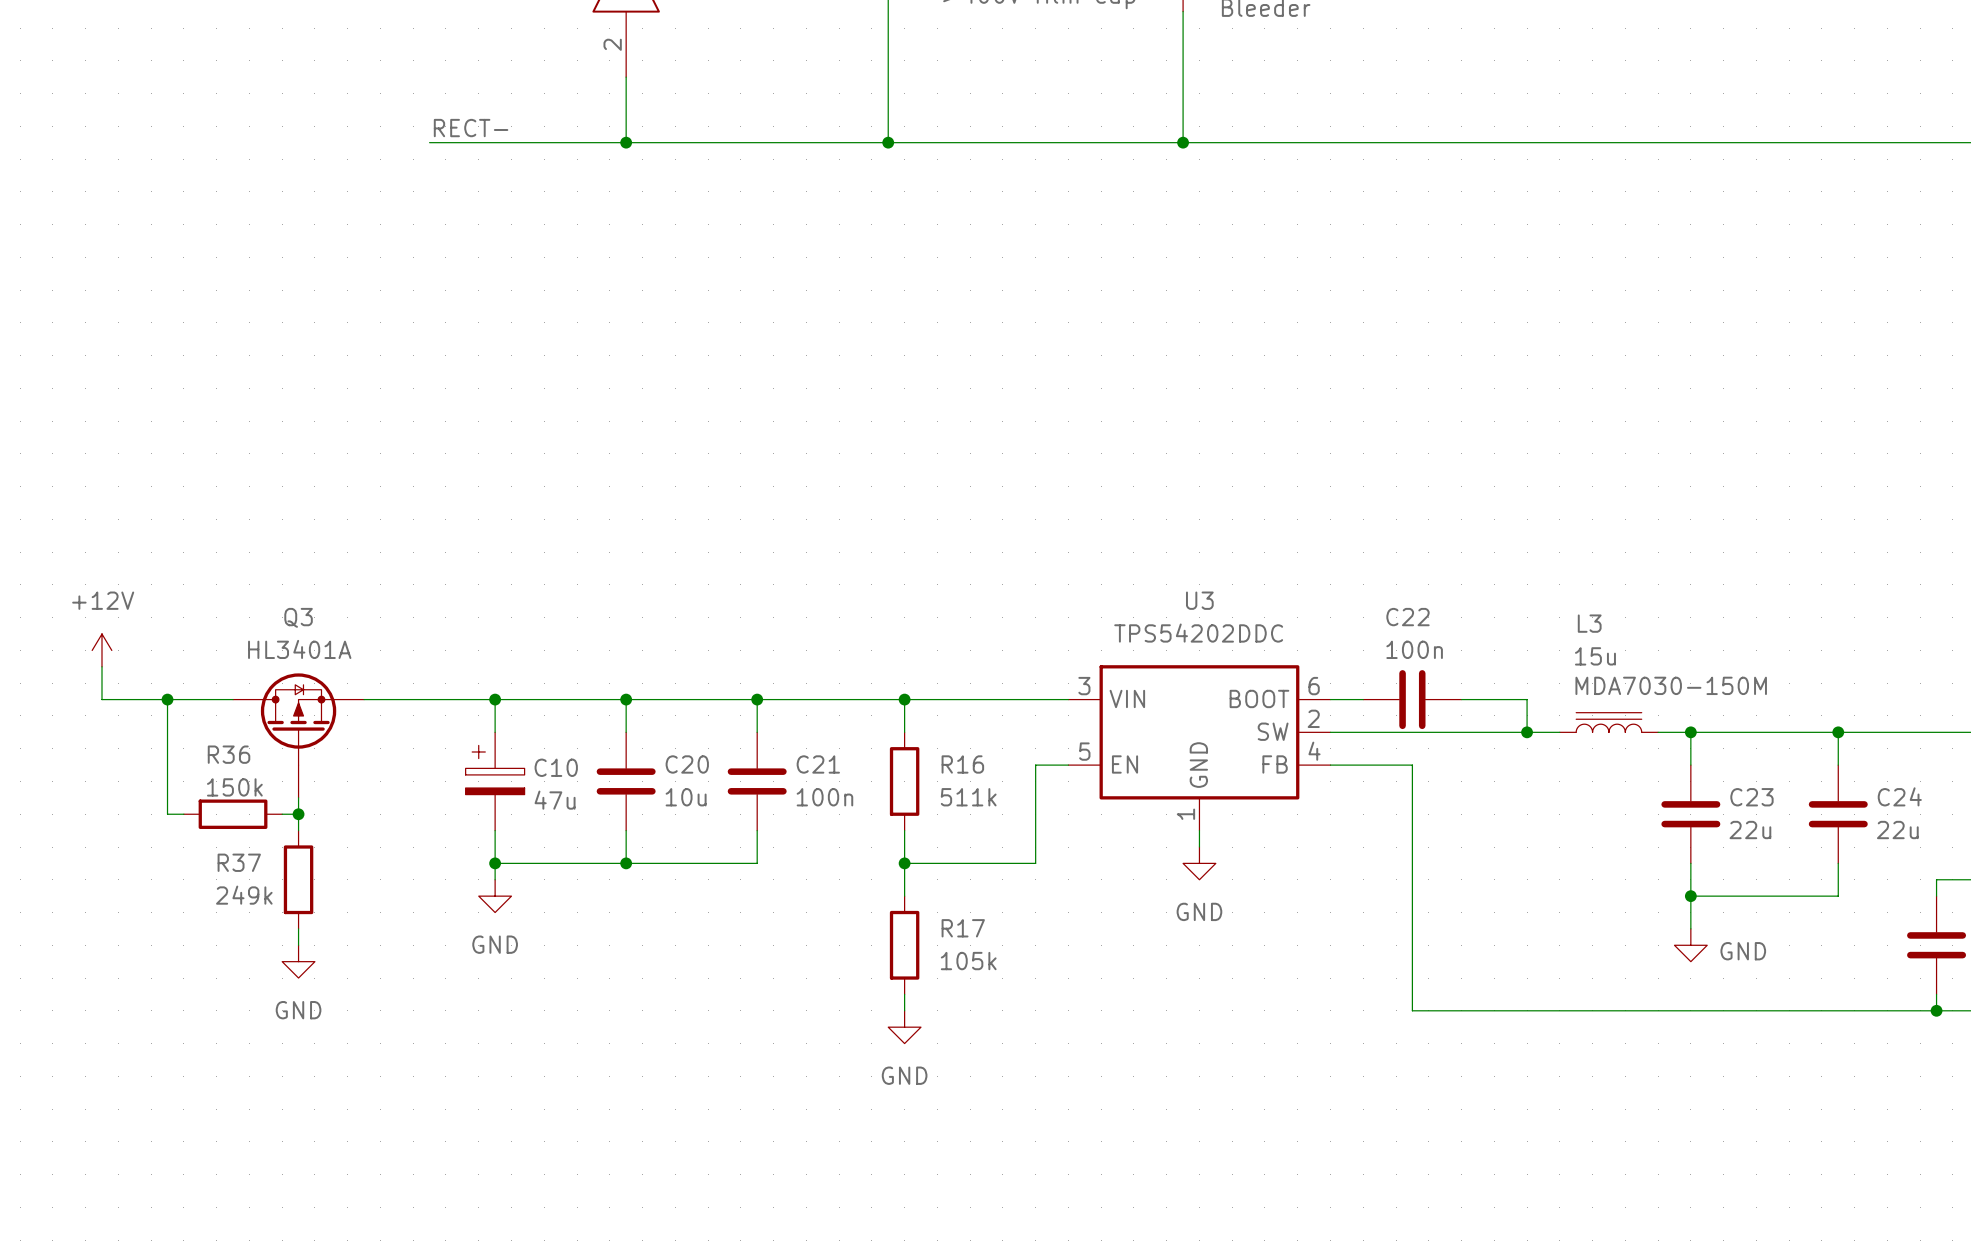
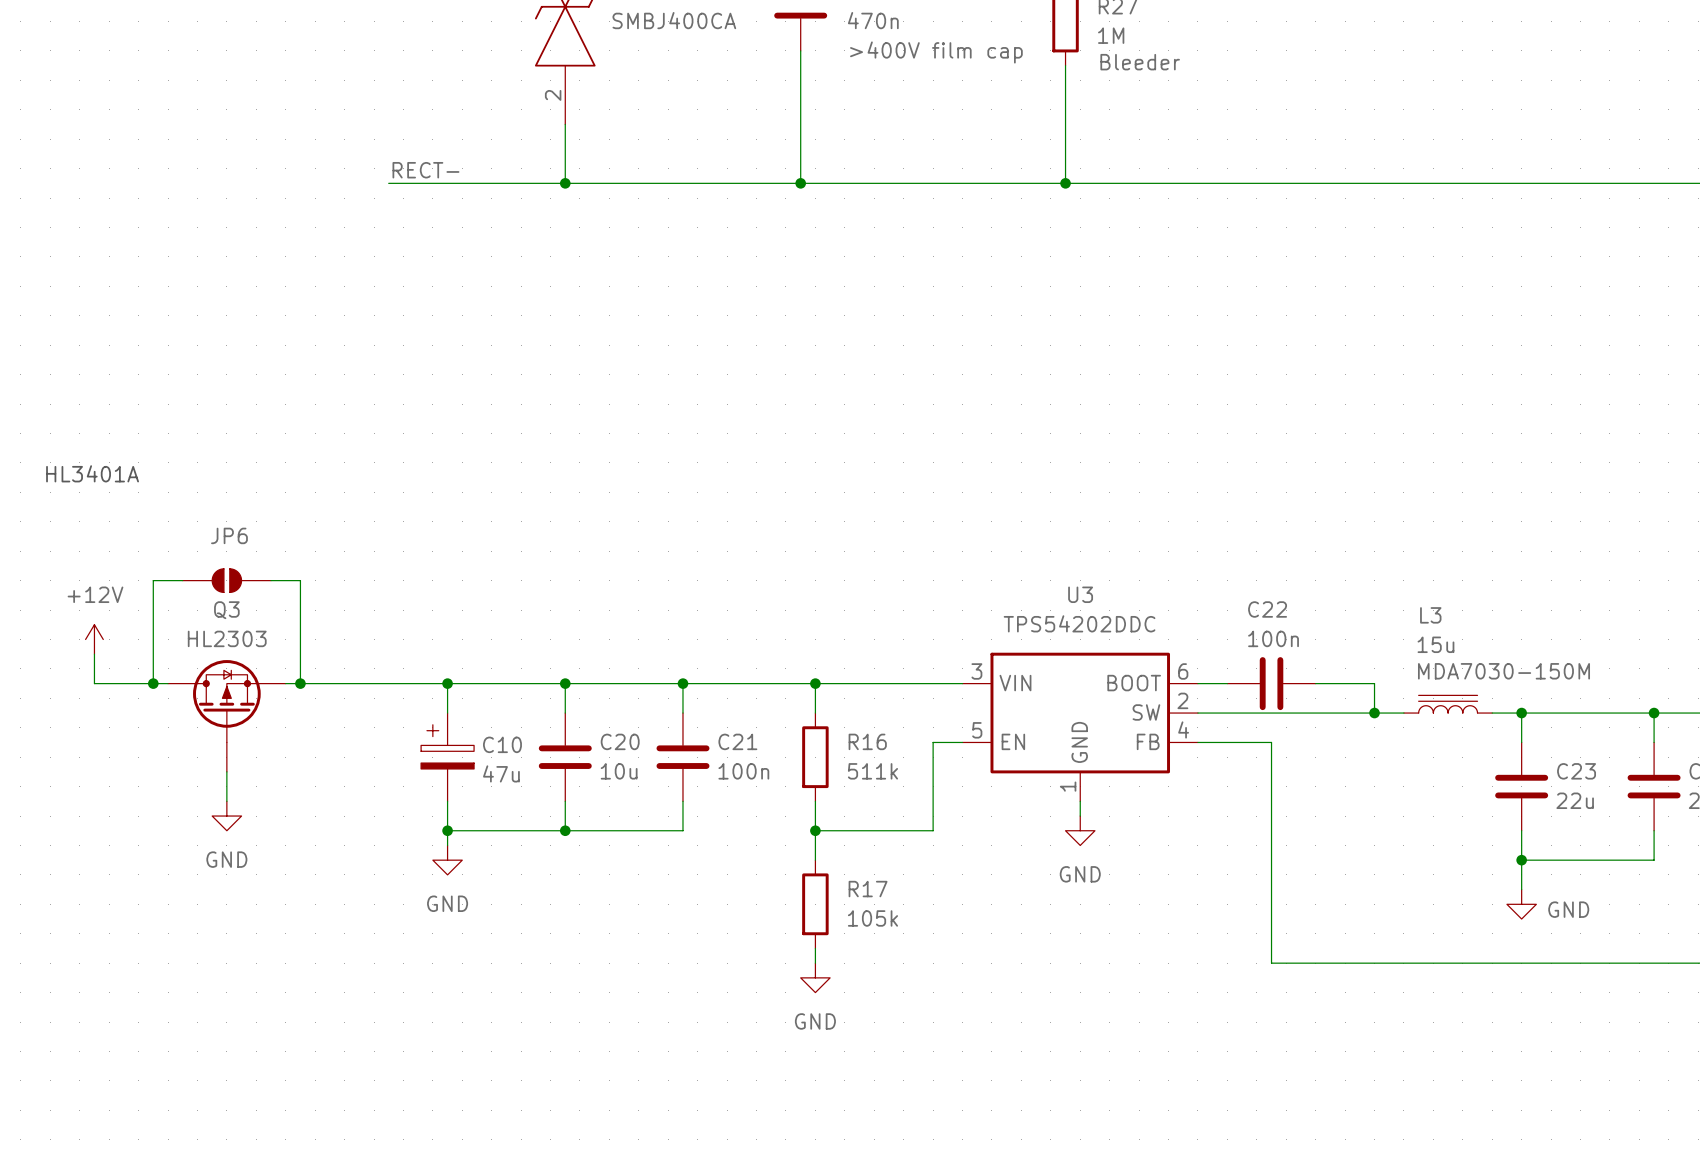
text: none -> HL3401A (92, 473)
JP6: none -> (226, 580)
wire: none -> (271, 580) (300, 580) (300, 683)
Q3 value: HL3401A (299, 649) -> HL2303 (227, 638)
wire: (167, 699) (167, 814) (183, 814) -> (153, 683) (153, 580) (182, 580)
junction: none -> (300, 683)
Q3 position: (298, 735) -> (226, 715)
wire: (298, 797) (298, 830) -> (226, 771) (226, 801)
R36: 150k (233, 814) -> none
wire: (282, 814) (298, 814) -> none
junction: (298, 814) -> none
R37: 249k (298, 879) -> none
wire: (298, 928) (298, 945) -> none
power symbol position: GND (298, 961) -> GND (226, 816)

